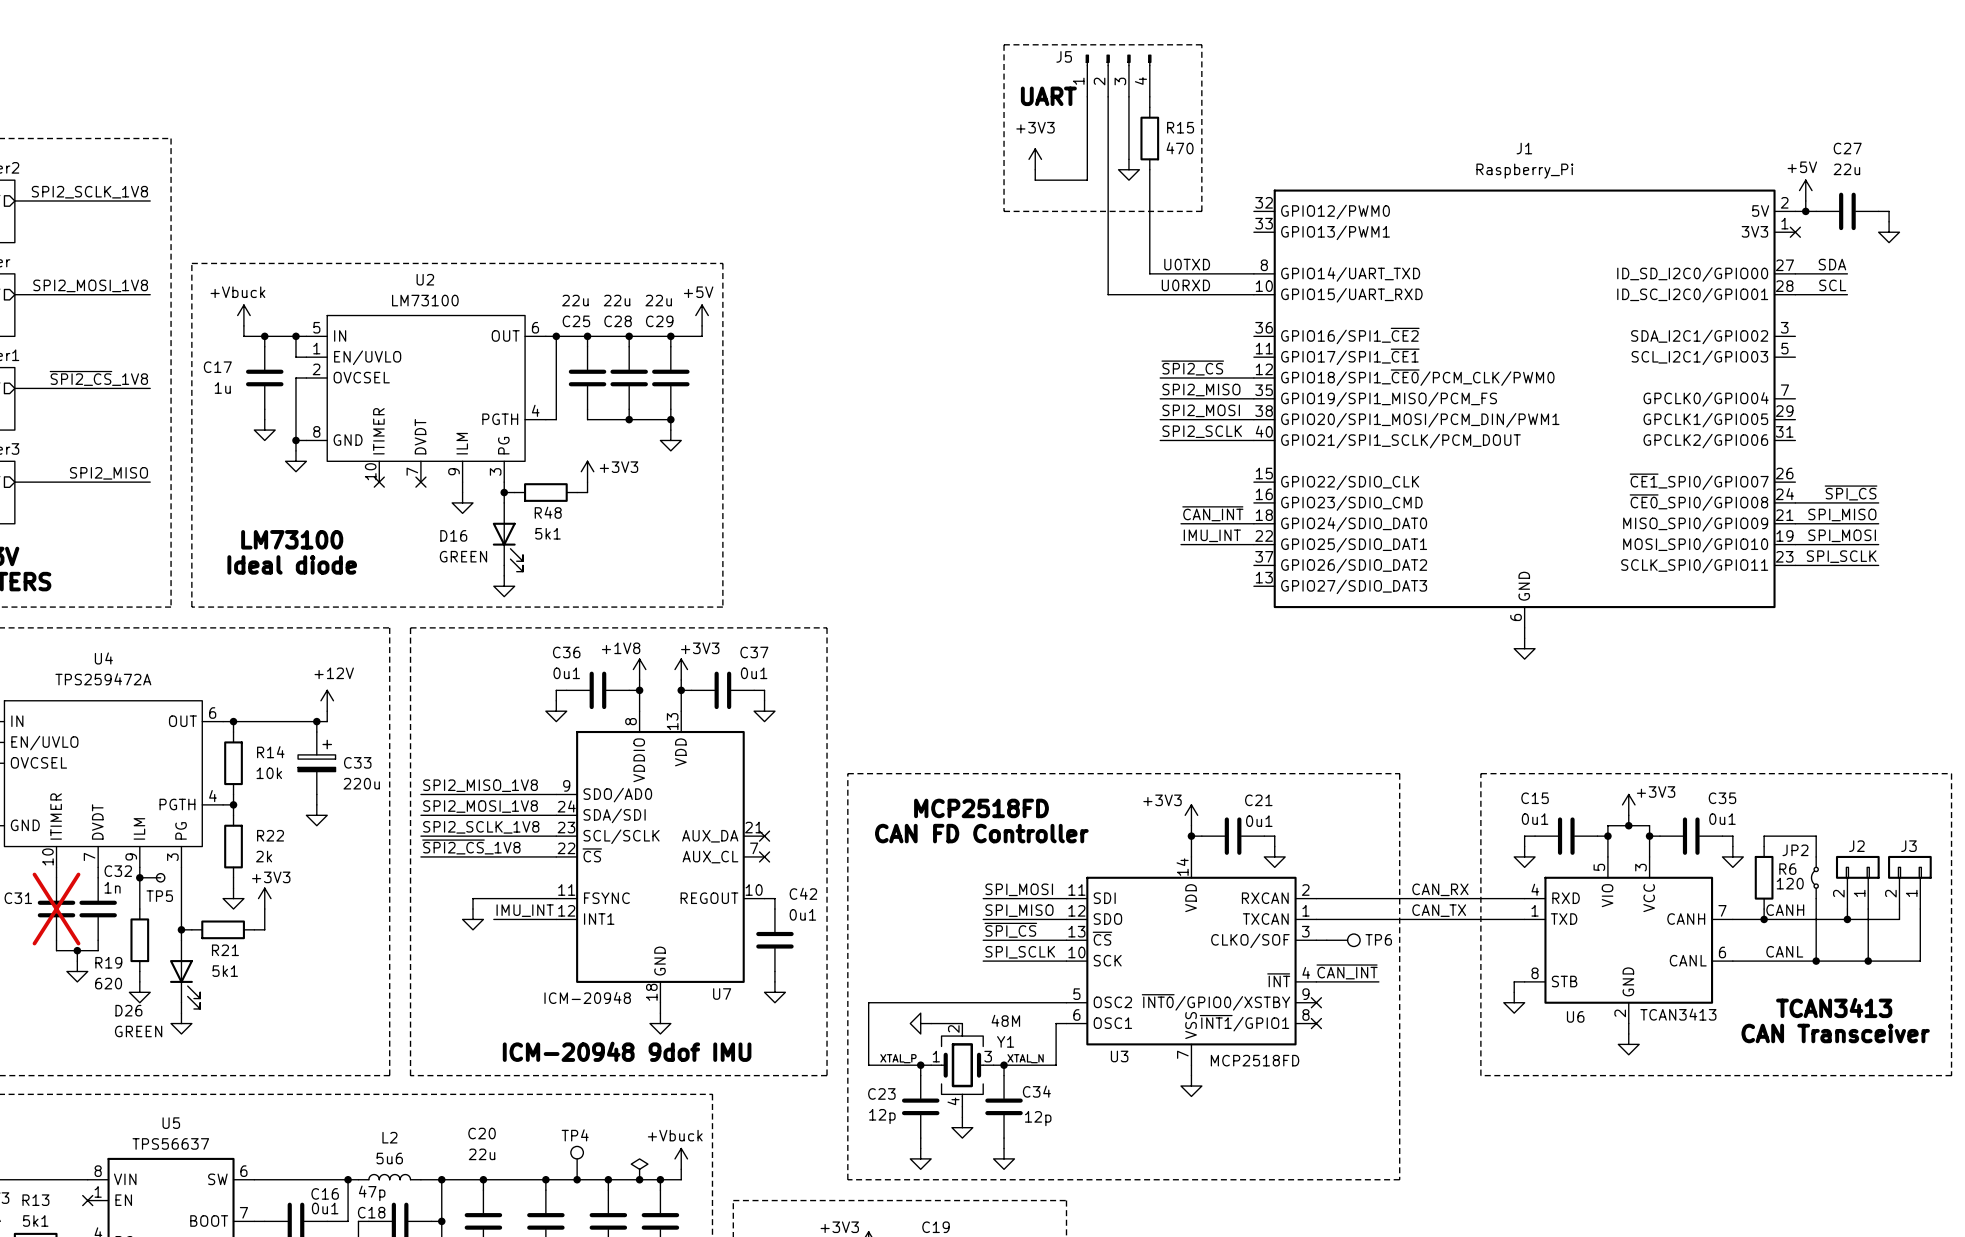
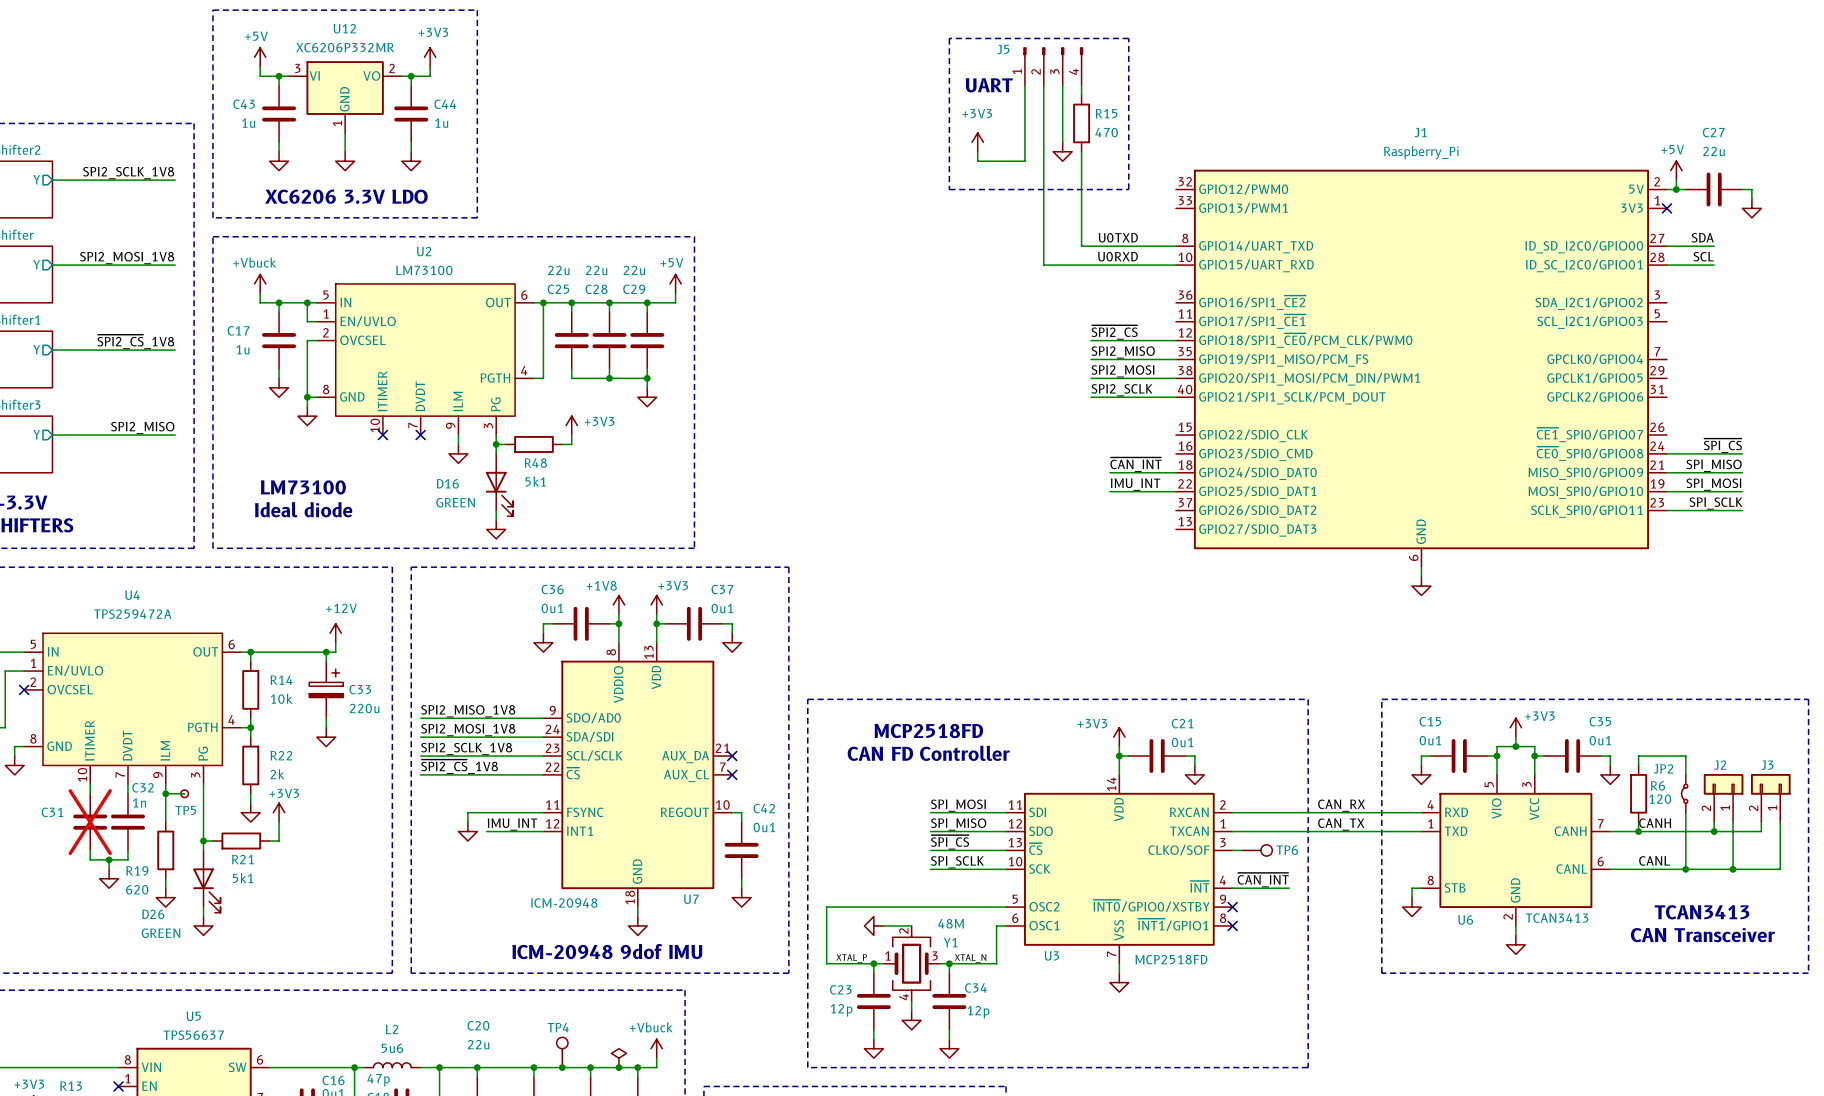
line: none -> (212, 10) (477, 10) (477, 217) (212, 217) (212, 10)
power symbol: none -> +5V (260, 57)
power symbol: none -> +3V3 (430, 57)
wire: none -> (260, 66) (260, 76) (288, 76)
wire: none -> (430, 66) (430, 76) (401, 76)
wire: none -> (279, 76) (279, 85)
junction: none -> (279, 76)
wire: none -> (411, 76) (411, 85)
junction: none -> (411, 76)
U12: none -> XC6206P332MR (345, 97)
C43: none -> 1u (279, 114)
C44: none -> 1u (411, 114)
wire: none -> (345, 132) (345, 151)
wire: none -> (279, 142) (279, 151)
wire: none -> (411, 142) (411, 151)
power symbol: none -> (279, 161)
power symbol: none -> (345, 161)
power symbol: none -> (411, 161)
text: none -> XC6206 3.3V LDO (346, 196)

